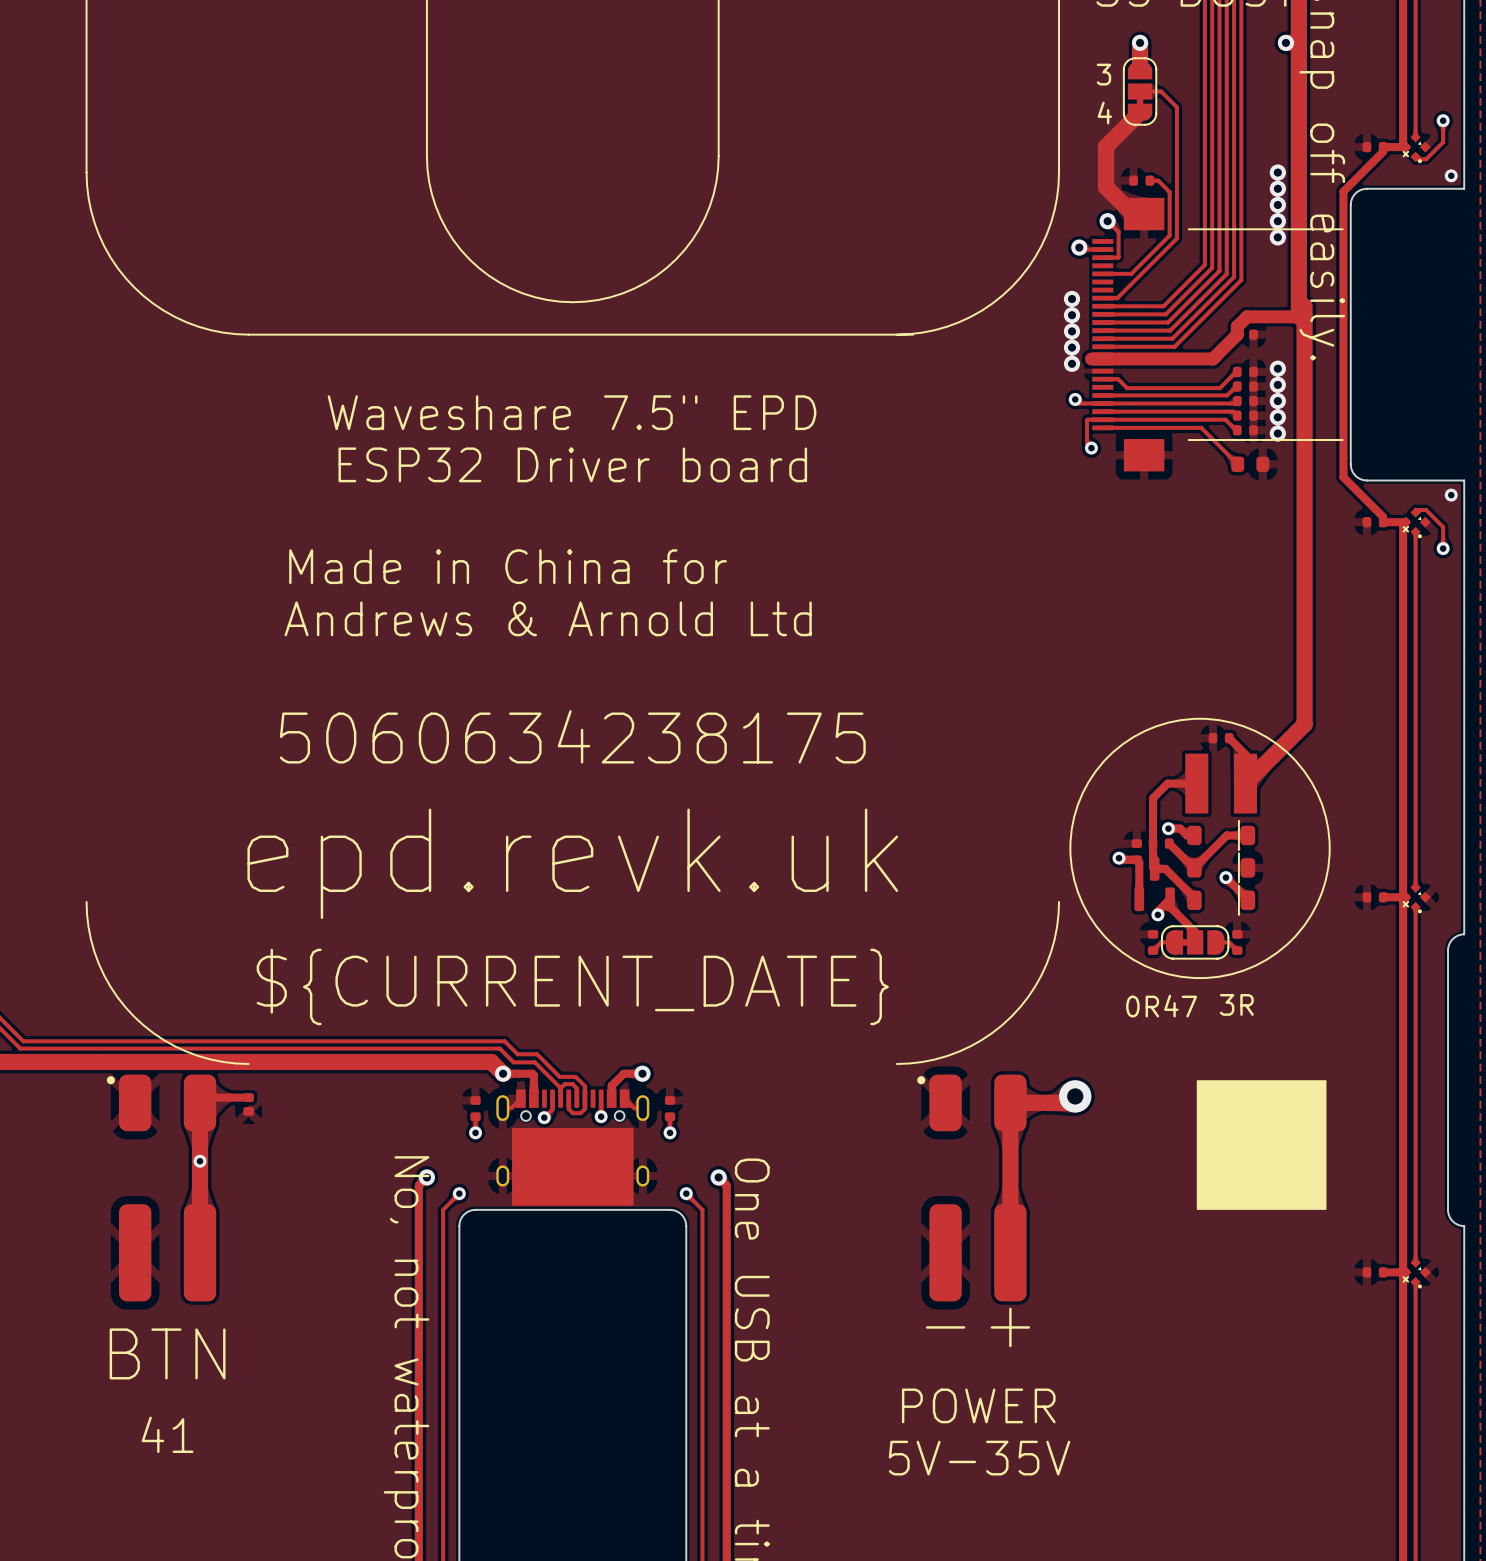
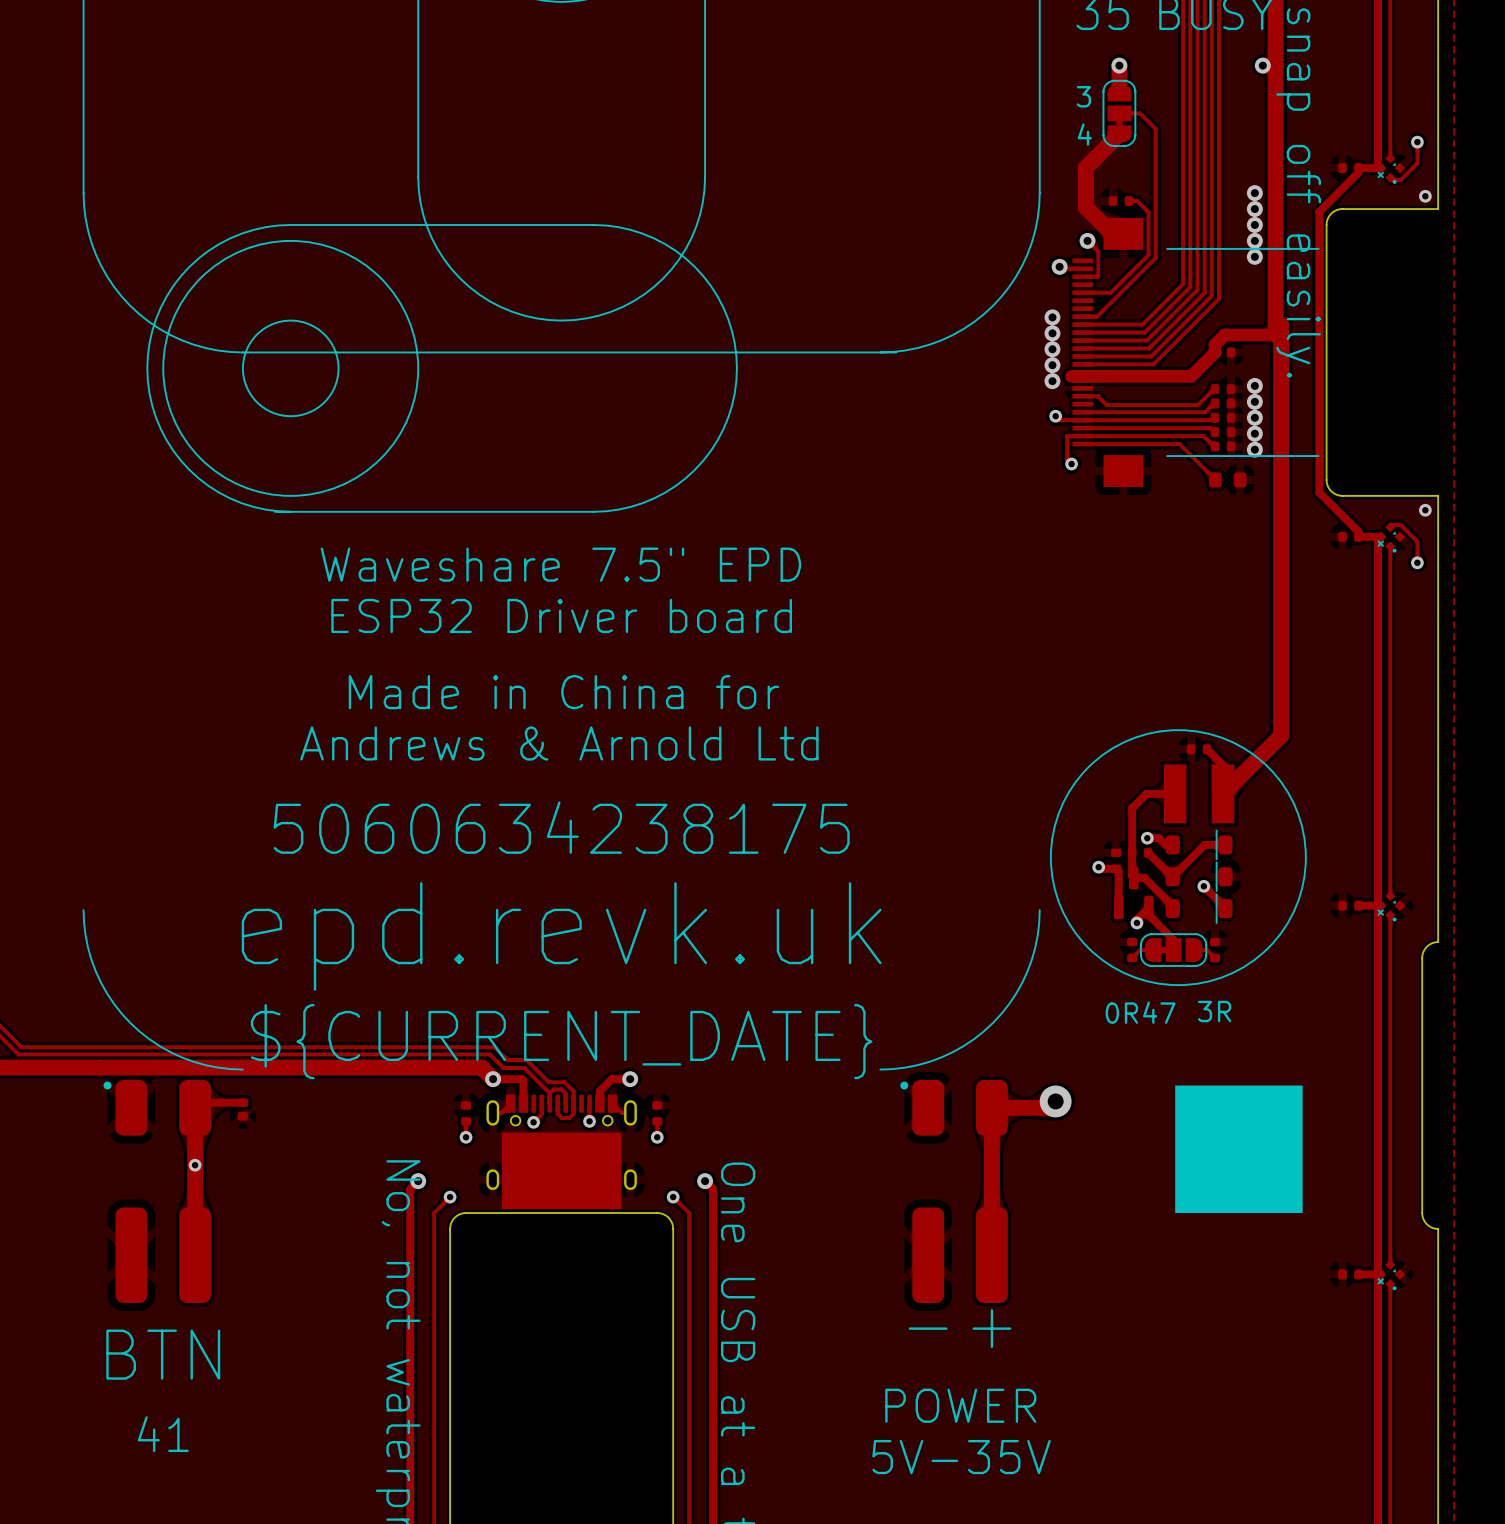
drawing: none -> [162, 239, 420, 497]
text position: Waveshare 7.5" EPD (572, 412) -> Waveshare 7.5" EPD (560, 564)
text position: ESP32 Driver board (572, 464) -> ESP32 Driver board (561, 615)
line: none -> (274, 511) (593, 511) (618, 509) (654, 498) (685, 478) (703, 460) (717, 440) (728, 417) (734, 393) (736, 368) (732, 331) (723, 307) (703, 276) (685, 258) (654, 238) (618, 227) (593, 224) (290, 224) (265, 227) (230, 238) (208, 250) (189, 266) (173, 286) (160, 307) (152, 331) (147, 355) (147, 380) (152, 405) (166, 440) (180, 460) (198, 478) (219, 492) (241, 503) (265, 509) (278, 511) (290, 511)
text position: Made in China for (508, 566) -> Made in China for (563, 692)
text position: Andrews & Arnold Ltd (548, 618) -> Andrews & Arnold Ltd (559, 743)
text position: 5060634238175 (572, 736) -> 5060634238175 (561, 827)
text position: epd.revk.uk (572, 863) -> epd.revk.uk (561, 936)
text position: ${CURRENT_DATE} (572, 986) -> ${CURRENT_DATE} (561, 1041)

